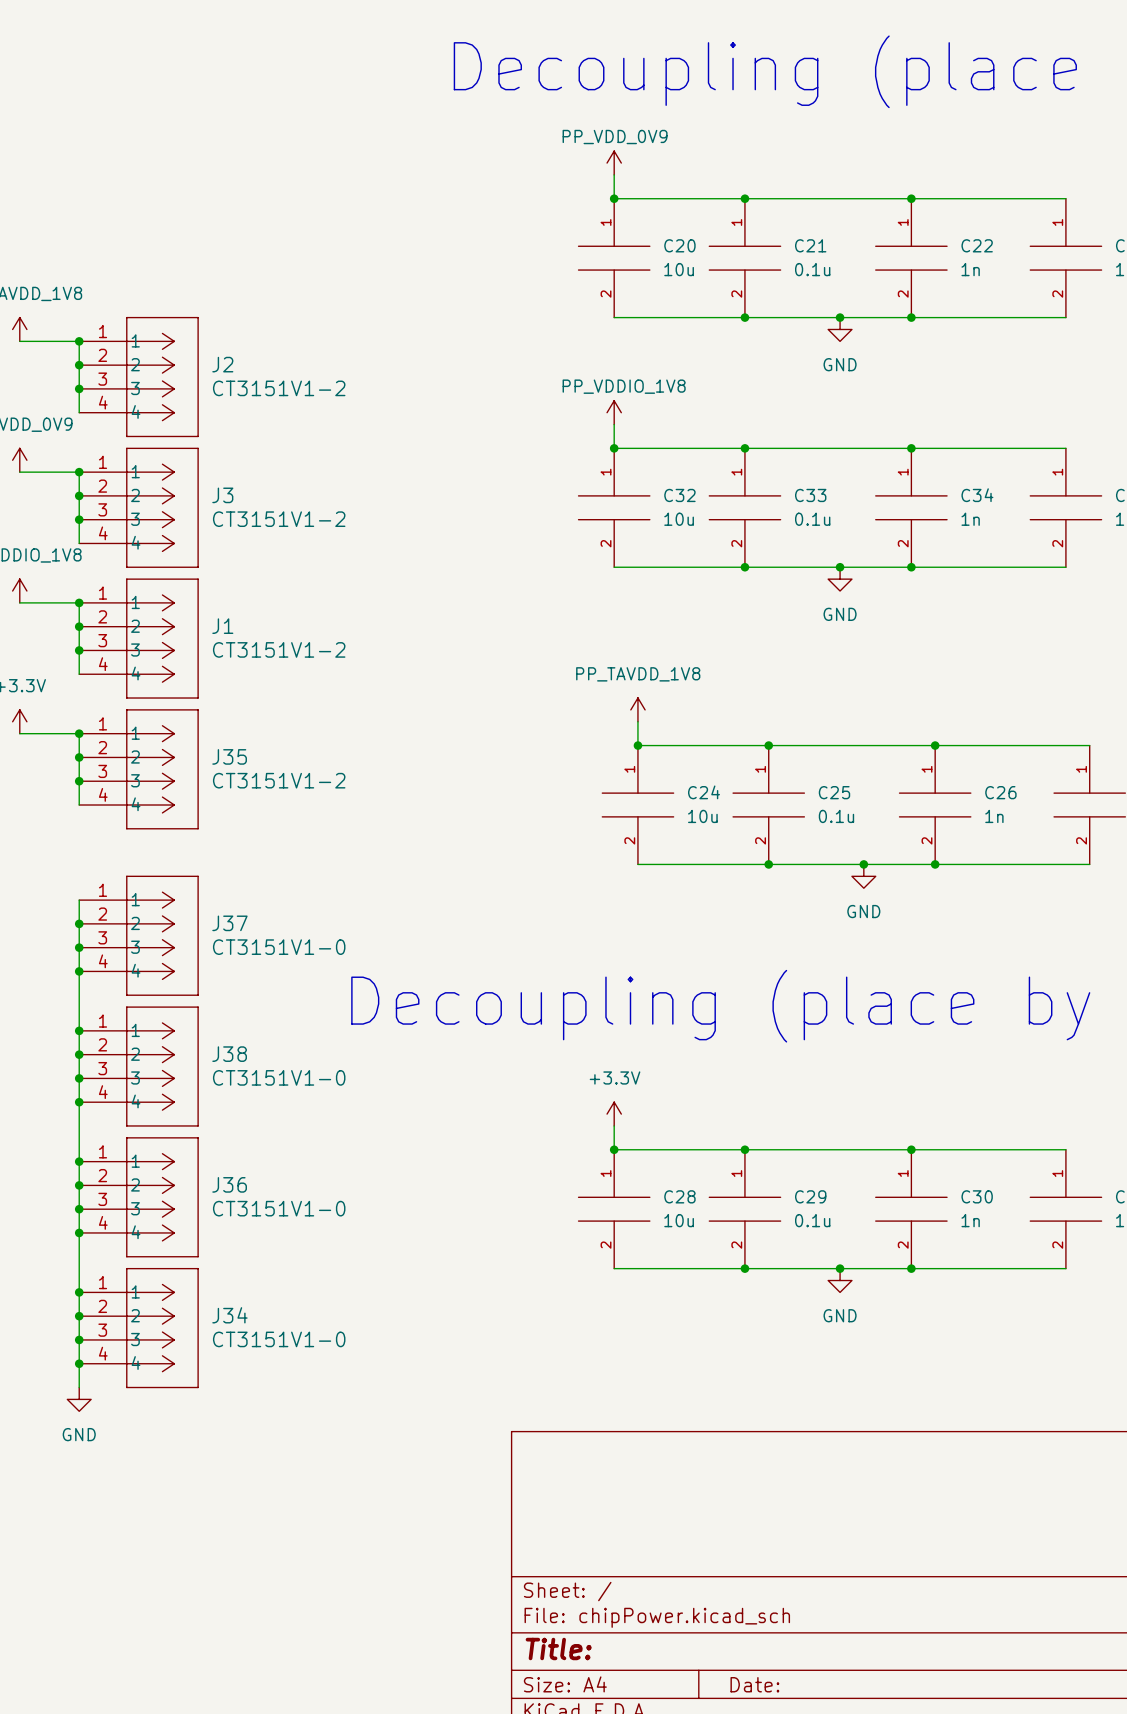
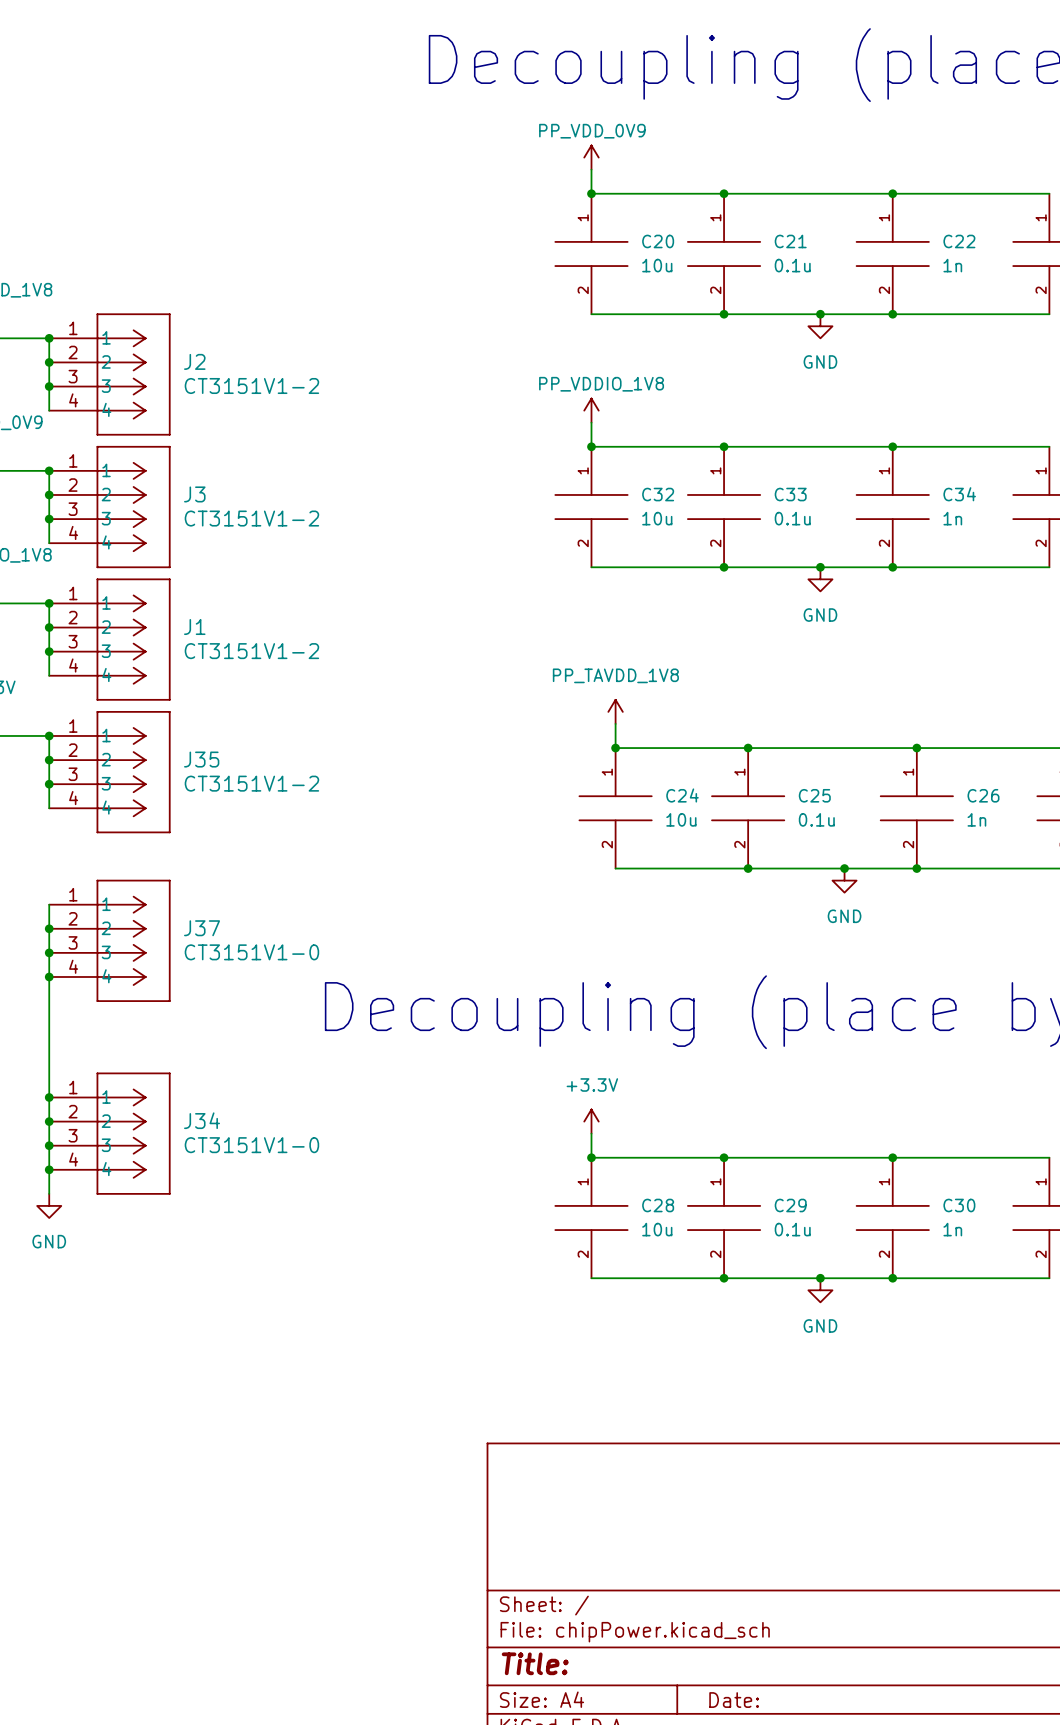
junction: (79, 1030) -> none
junction: (79, 1054) -> none
J38: CT3151V1-0 (138, 1066) -> none
junction: (79, 1078) -> none
junction: none -> (49, 1097)
junction: (79, 1102) -> none
junction: none -> (49, 1121)
junction: none -> (49, 1145)
wire: (79, 1185) (79, 1387) -> none
junction: (79, 1185) -> none
J36: CT3151V1-0 (138, 1197) -> none
junction: (79, 1209) -> none
junction: (79, 1232) -> none
junction: (79, 1292) -> none
junction: (79, 1316) -> none
J34 position: (138, 1328) -> (109, 1133)
junction: (79, 1339) -> none
junction: (79, 1363) -> none
power symbol position: GND (79, 1399) -> GND (49, 1205)

